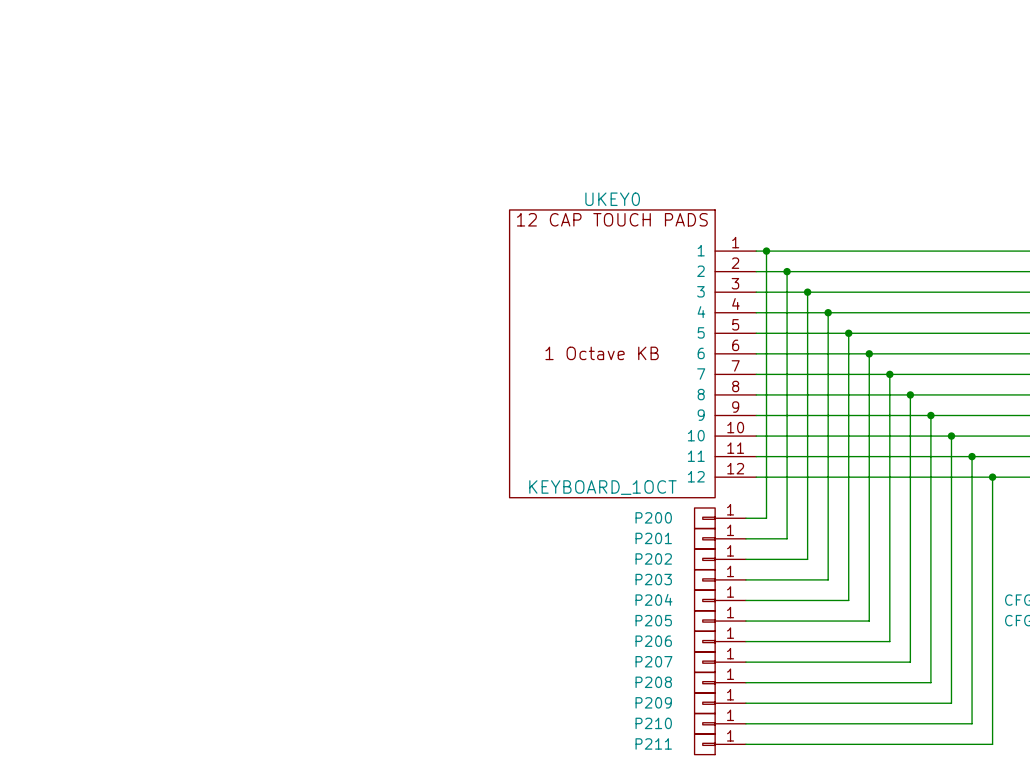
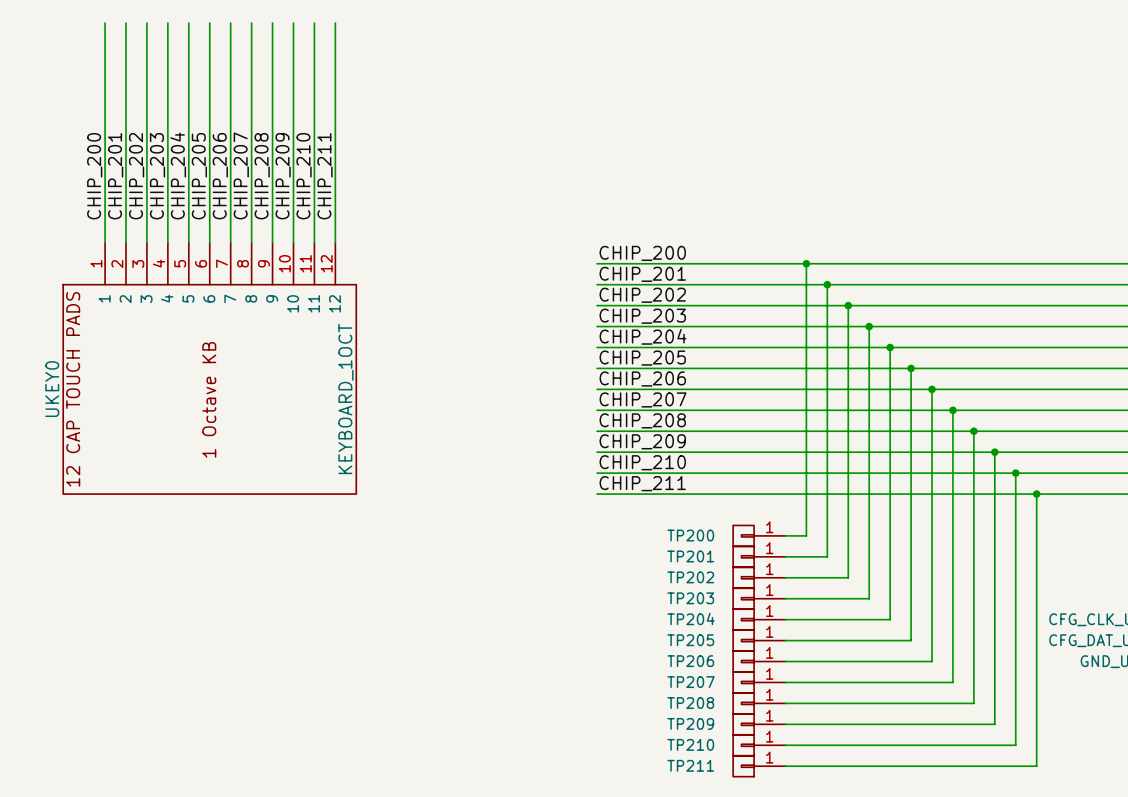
wire: none -> (105, 23) (105, 242)
wire: none -> (126, 23) (126, 242)
wire: none -> (146, 23) (146, 242)
wire: none -> (167, 23) (167, 242)
wire: none -> (188, 23) (188, 242)
wire: none -> (209, 23) (209, 242)
wire: none -> (230, 23) (230, 242)
wire: none -> (251, 23) (251, 242)
wire: none -> (272, 23) (272, 242)
wire: none -> (293, 23) (293, 242)
wire: none -> (314, 23) (314, 242)
wire: none -> (335, 23) (335, 242)
label: none -> CHIP_204 (178, 175)
label: none -> CHIP_207 (241, 175)
label: none -> CHIP_200 (94, 176)
label: none -> CHIP_201 (115, 176)
label: none -> CHIP_202 (136, 176)
label: none -> CHIP_203 (157, 176)
label: none -> CHIP_205 (199, 176)
label: none -> CHIP_206 (220, 176)
label: none -> CHIP_208 (262, 176)
label: none -> CHIP_209 (283, 176)
label: none -> CHIP_210 (304, 176)
label: none -> CHIP_211 (325, 176)
label: none -> CHIP_200 (642, 253)
wire: none -> (597, 263) (795, 263)
label: none -> CHIP_201 (642, 274)
wire: none -> (597, 284) (795, 284)
label: none -> CHIP_202 (642, 295)
wire: none -> (597, 305) (795, 305)
label: none -> CHIP_203 (642, 316)
wire: none -> (597, 326) (795, 326)
label: none -> CHIP_204 (643, 336)
wire: none -> (597, 347) (795, 347)
label: none -> CHIP_205 (642, 358)
wire: none -> (597, 368) (795, 368)
UKEY0 rotation: 0° (612, 353) -> 90° counterclockwise (209, 389)
UKEY0 position: (632, 353) -> (209, 368)
label: none -> CHIP_206 (642, 379)
wire: none -> (597, 389) (795, 389)
label: none -> CHIP_207 (643, 399)
wire: none -> (597, 410) (795, 410)
label: none -> CHIP_208 (642, 420)
wire: none -> (597, 431) (795, 431)
label: none -> CHIP_209 (642, 441)
wire: none -> (597, 452) (795, 452)
label: none -> CHIP_210 (642, 462)
wire: none -> (597, 473) (795, 473)
label: none -> CHIP_211 (642, 483)
wire: none -> (597, 494) (795, 494)
P200 name: P200 (653, 517) -> TP200 (690, 535)
P201 name: P201 (653, 538) -> TP201 (690, 556)
P202 name: P202 (653, 558) -> TP202 (690, 577)
P203 name: P203 (653, 579) -> TP203 (690, 598)
P204 name: P204 (653, 599) -> TP204 (691, 619)
P205 name: P205 (653, 620) -> TP205 (690, 640)
P206 name: P206 (653, 641) -> TP206 (690, 661)
P207 name: P207 (653, 661) -> TP207 (691, 682)
P208 name: P208 (653, 682) -> TP208 (690, 703)
P209 name: P209 (653, 702) -> TP209 (690, 723)
P210 name: P210 (653, 723) -> TP210 (690, 744)
P211 name: P211 (653, 743) -> TP211 (690, 765)

